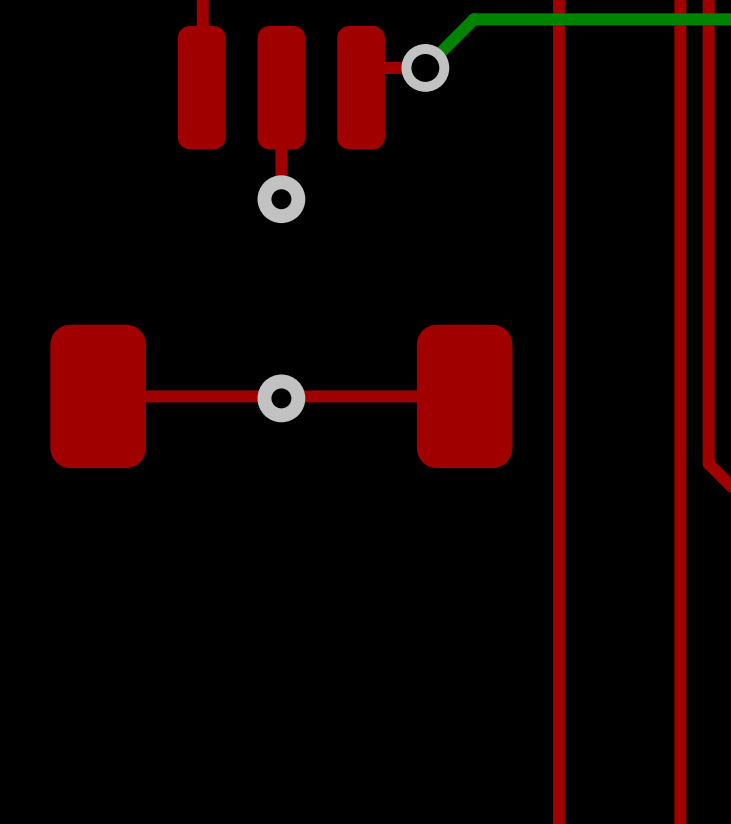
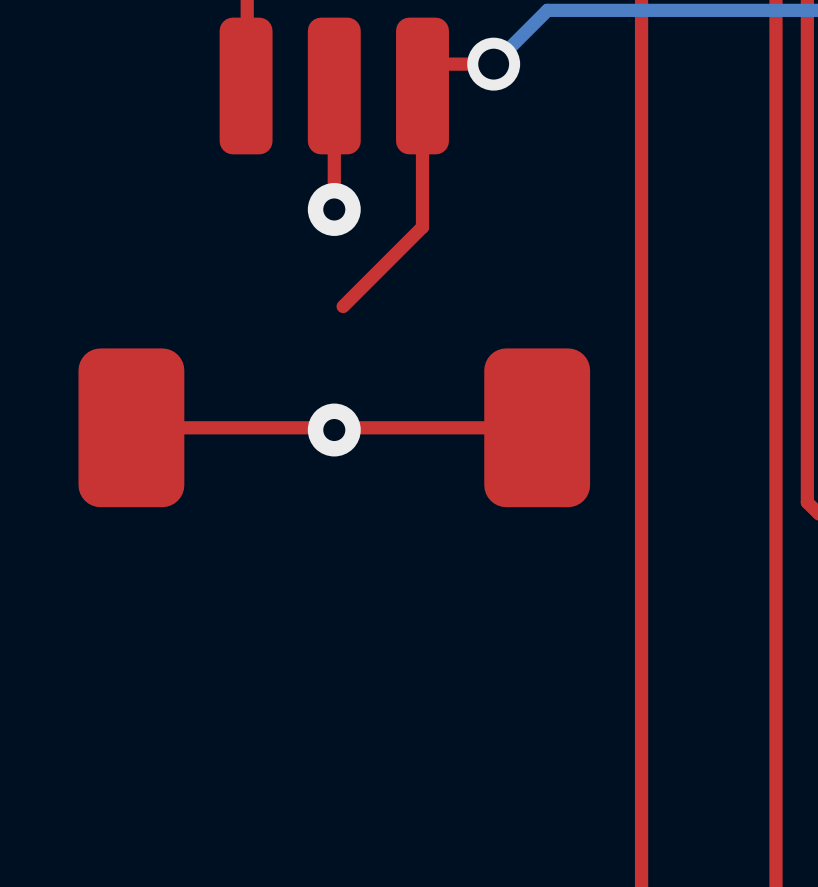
top track: none -> (422, 85) (422, 227) (343, 306)

